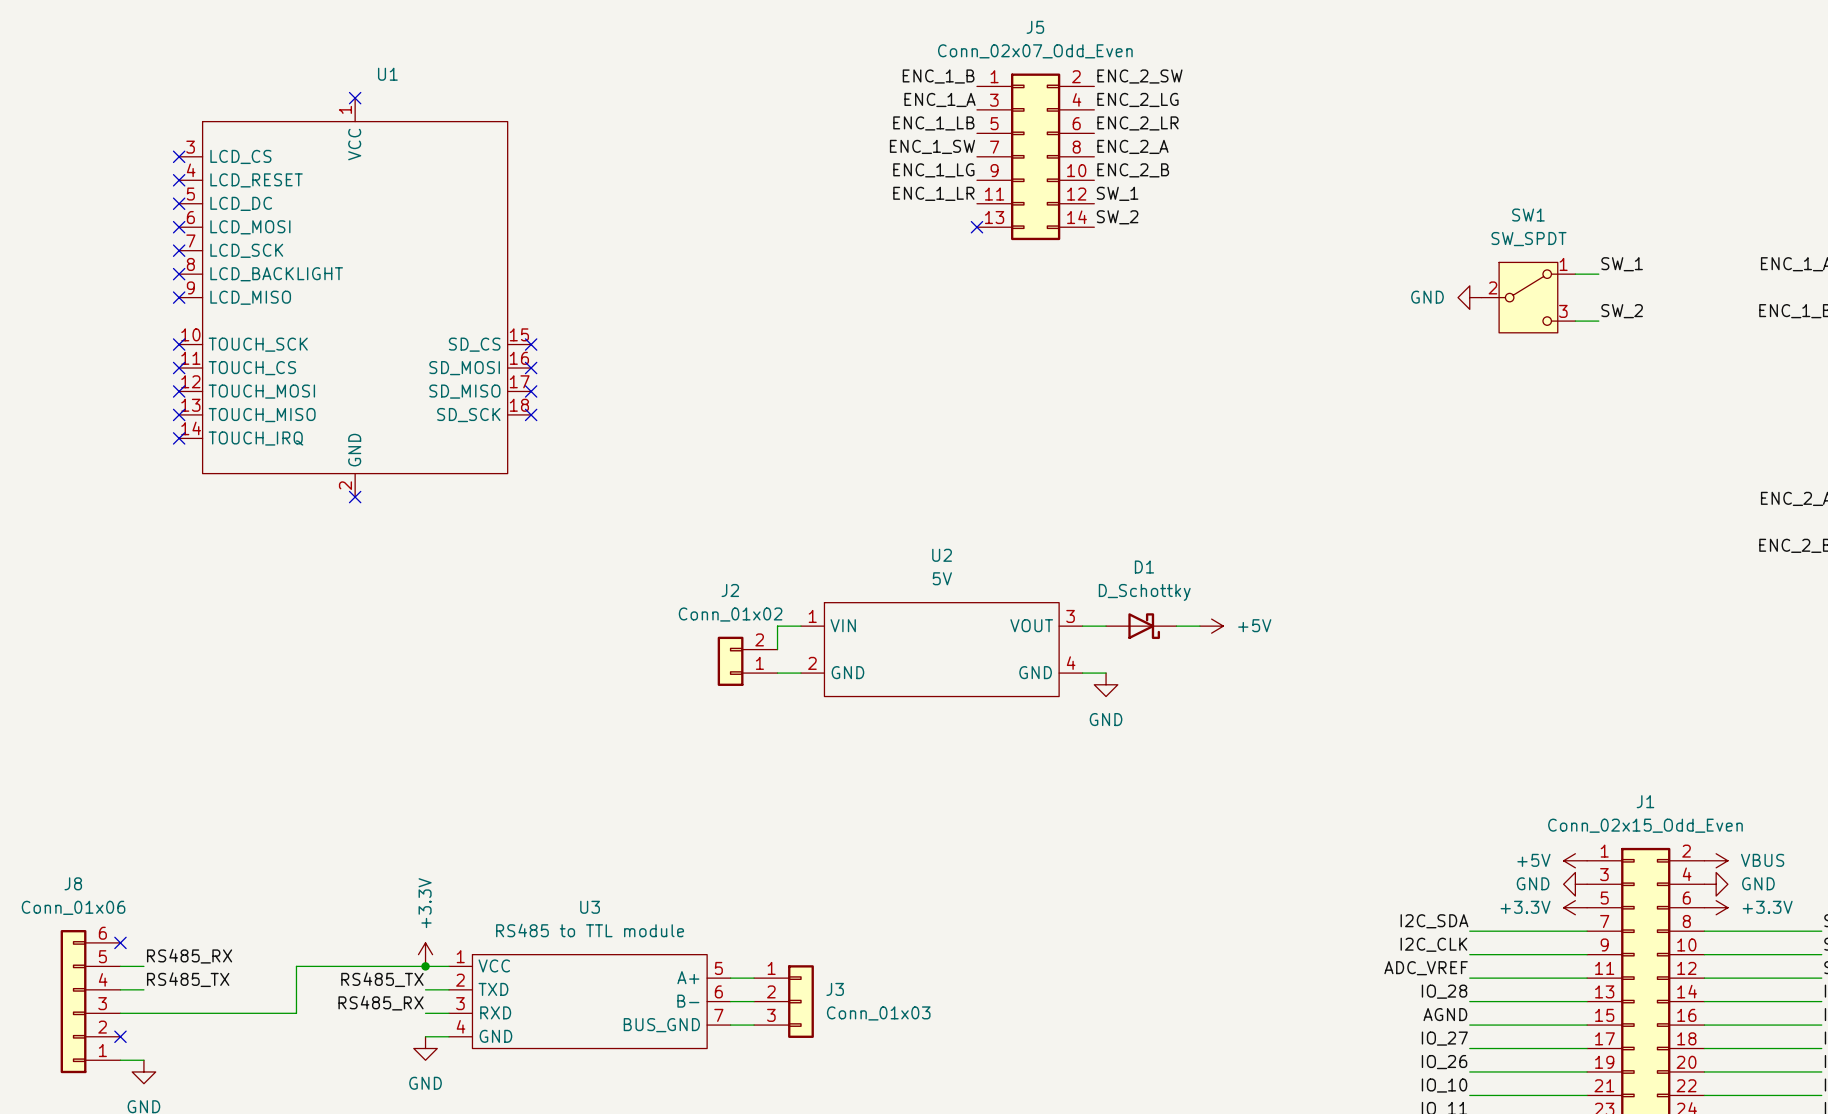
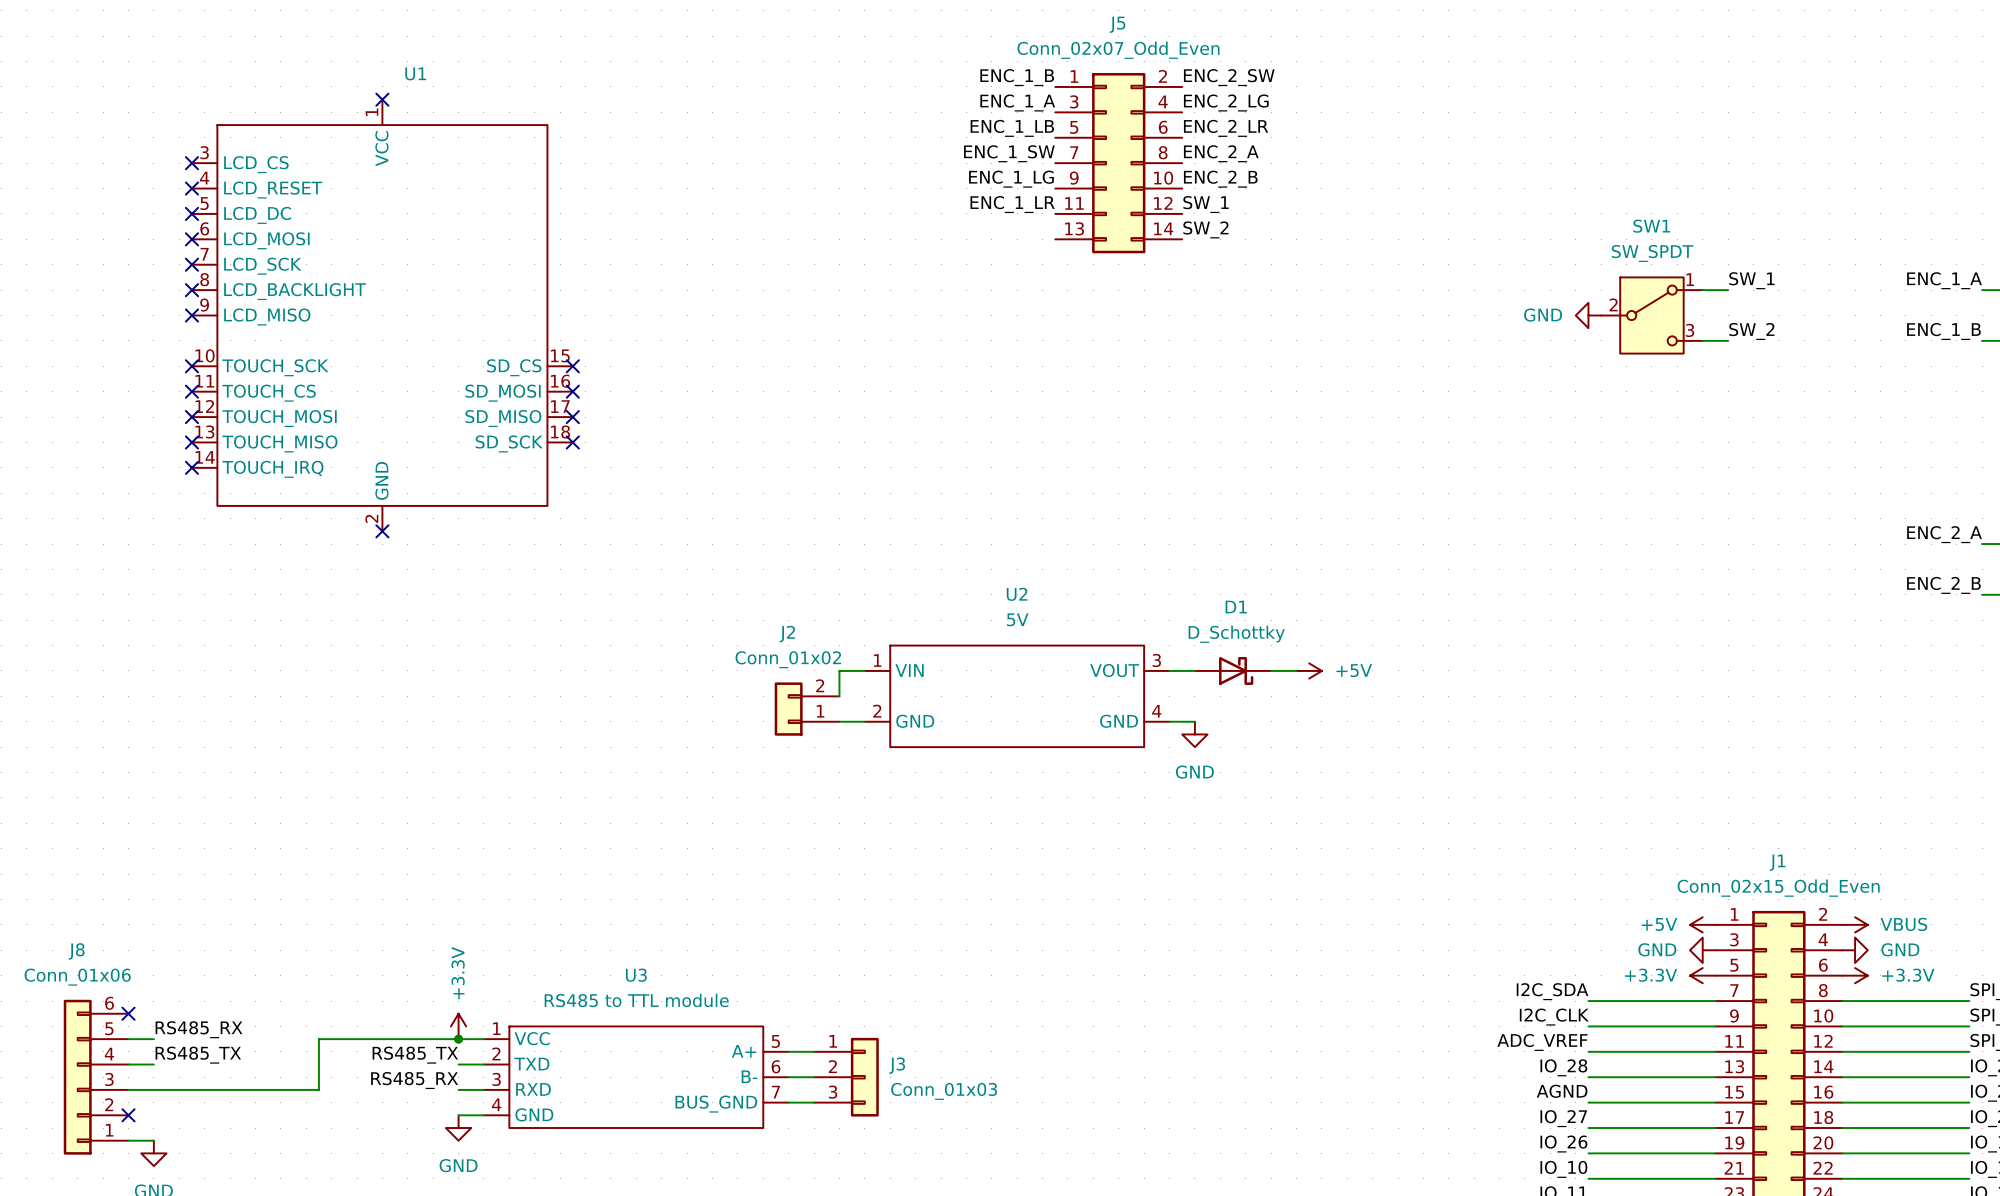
no-connect mark: (976, 227) -> none

